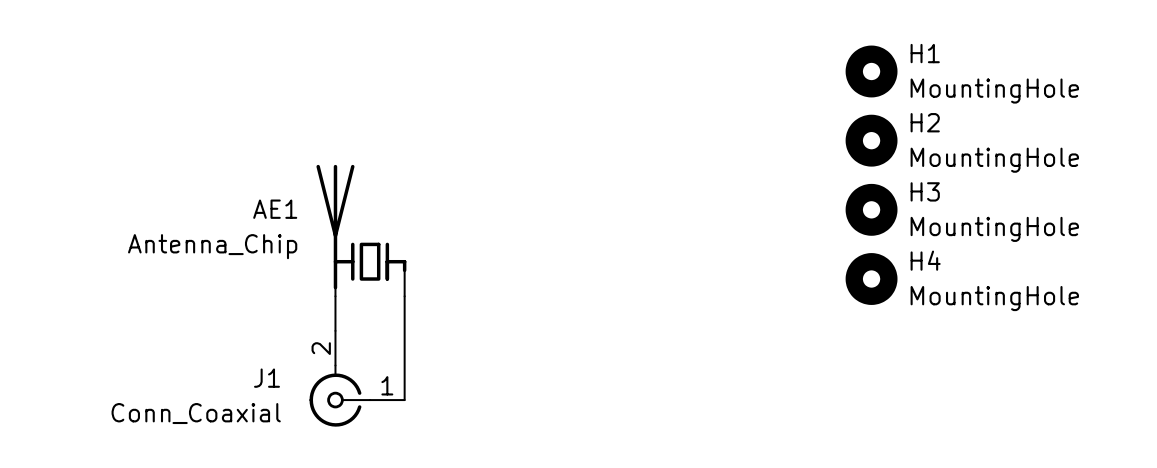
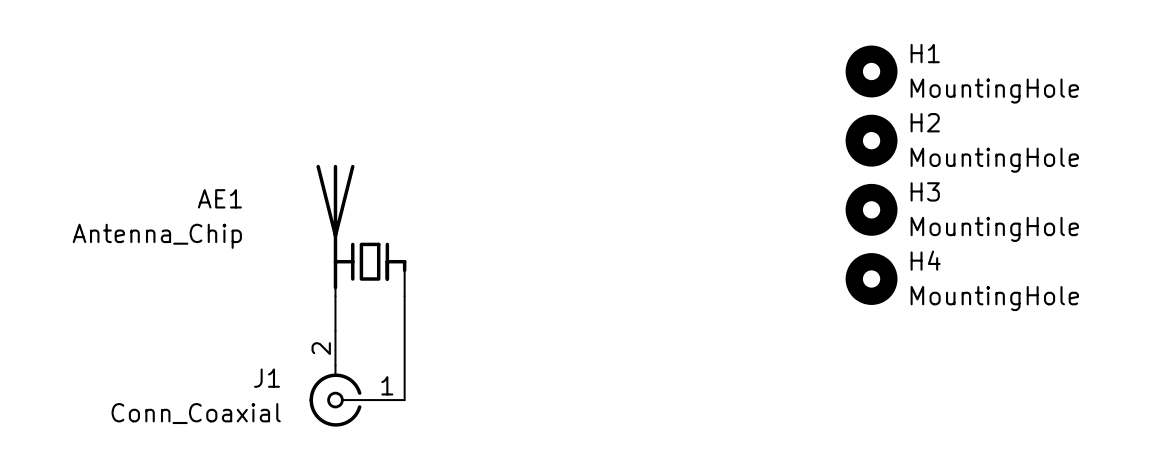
AE1 name position: AE1 (275, 209) -> AE1 (219, 198)
AE1 value position: Antenna_Chip (212, 246) -> Antenna_Chip (157, 236)

